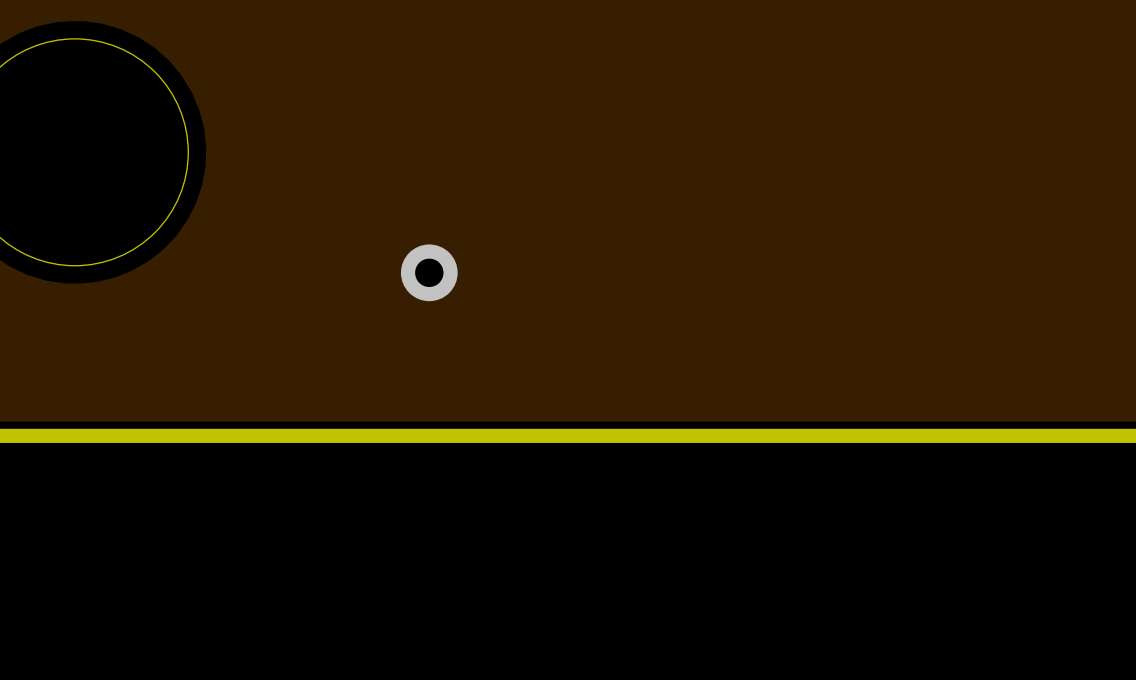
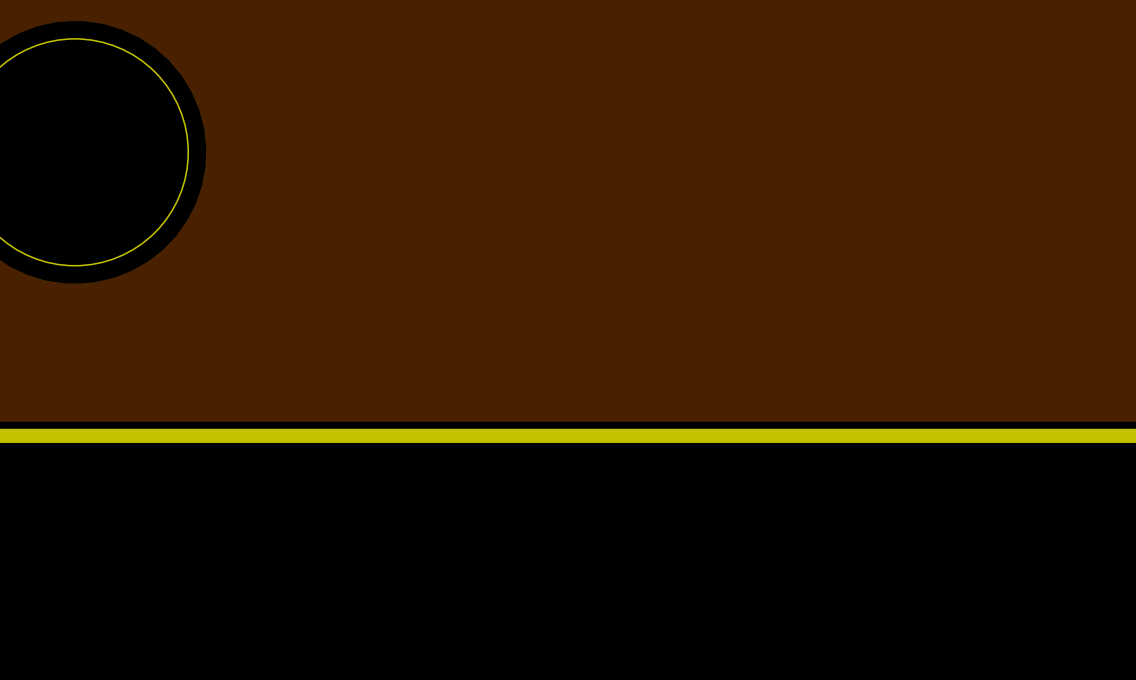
via: (429, 272) -> none

